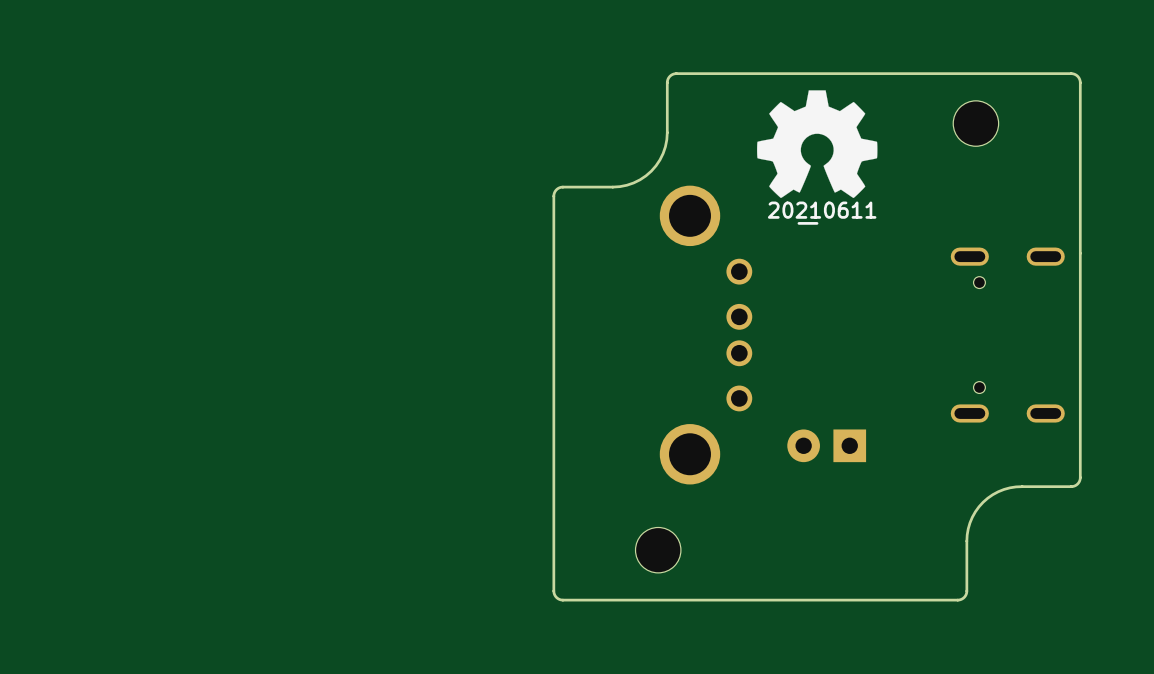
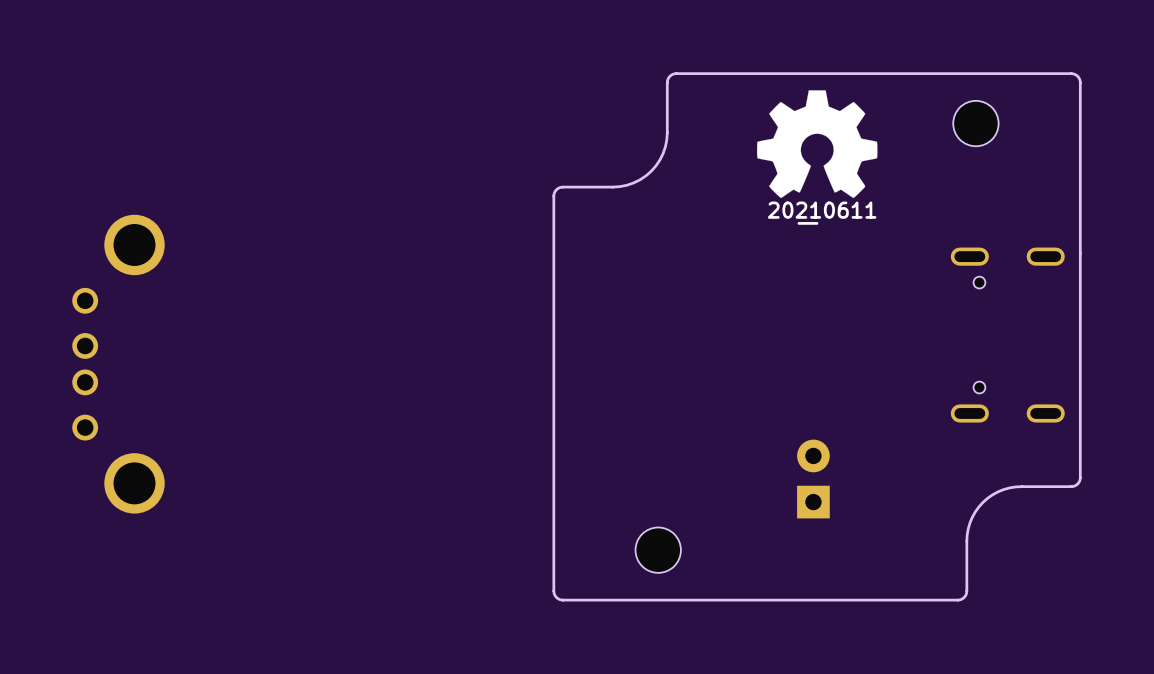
part: (706, 335) -> none
part: none -> (118, 364)
part rotation: 0° (826, 445) -> 90° clockwise (813, 479)

